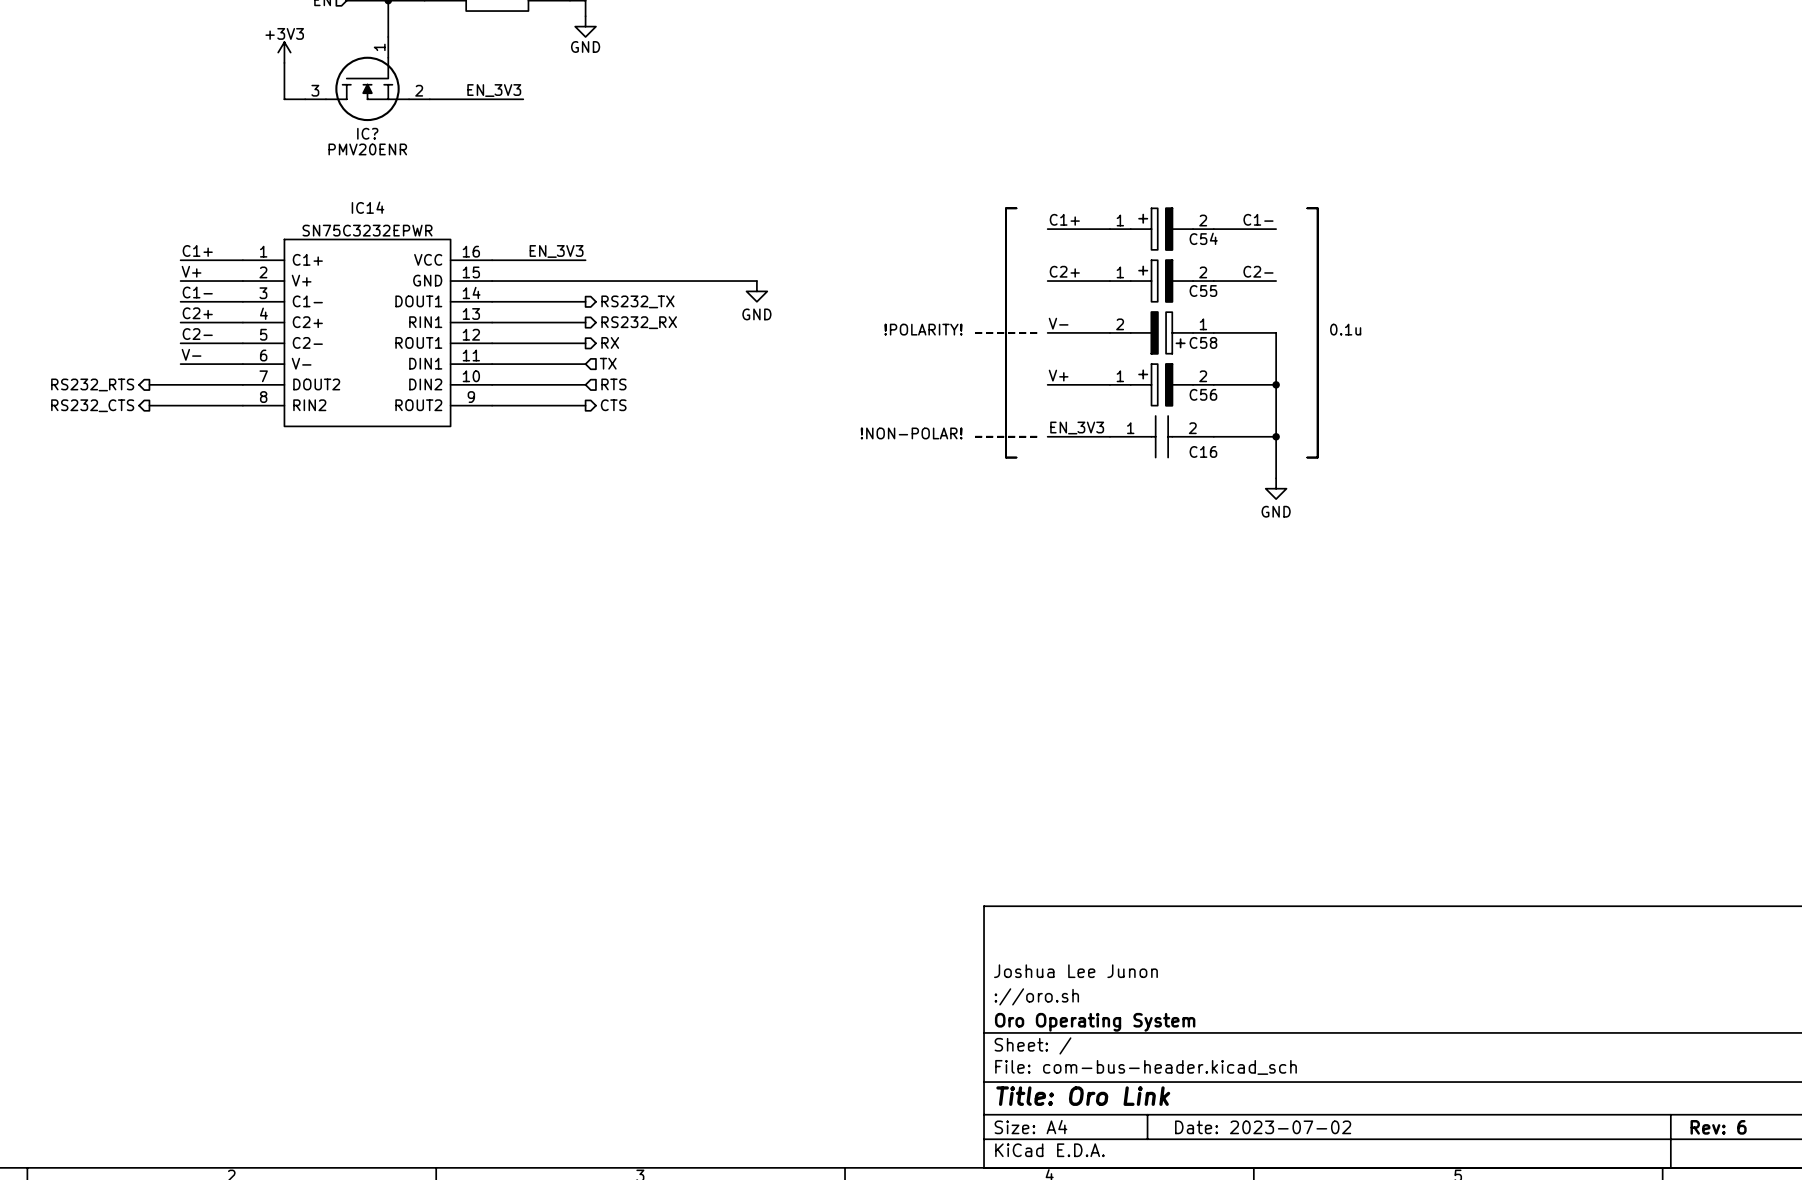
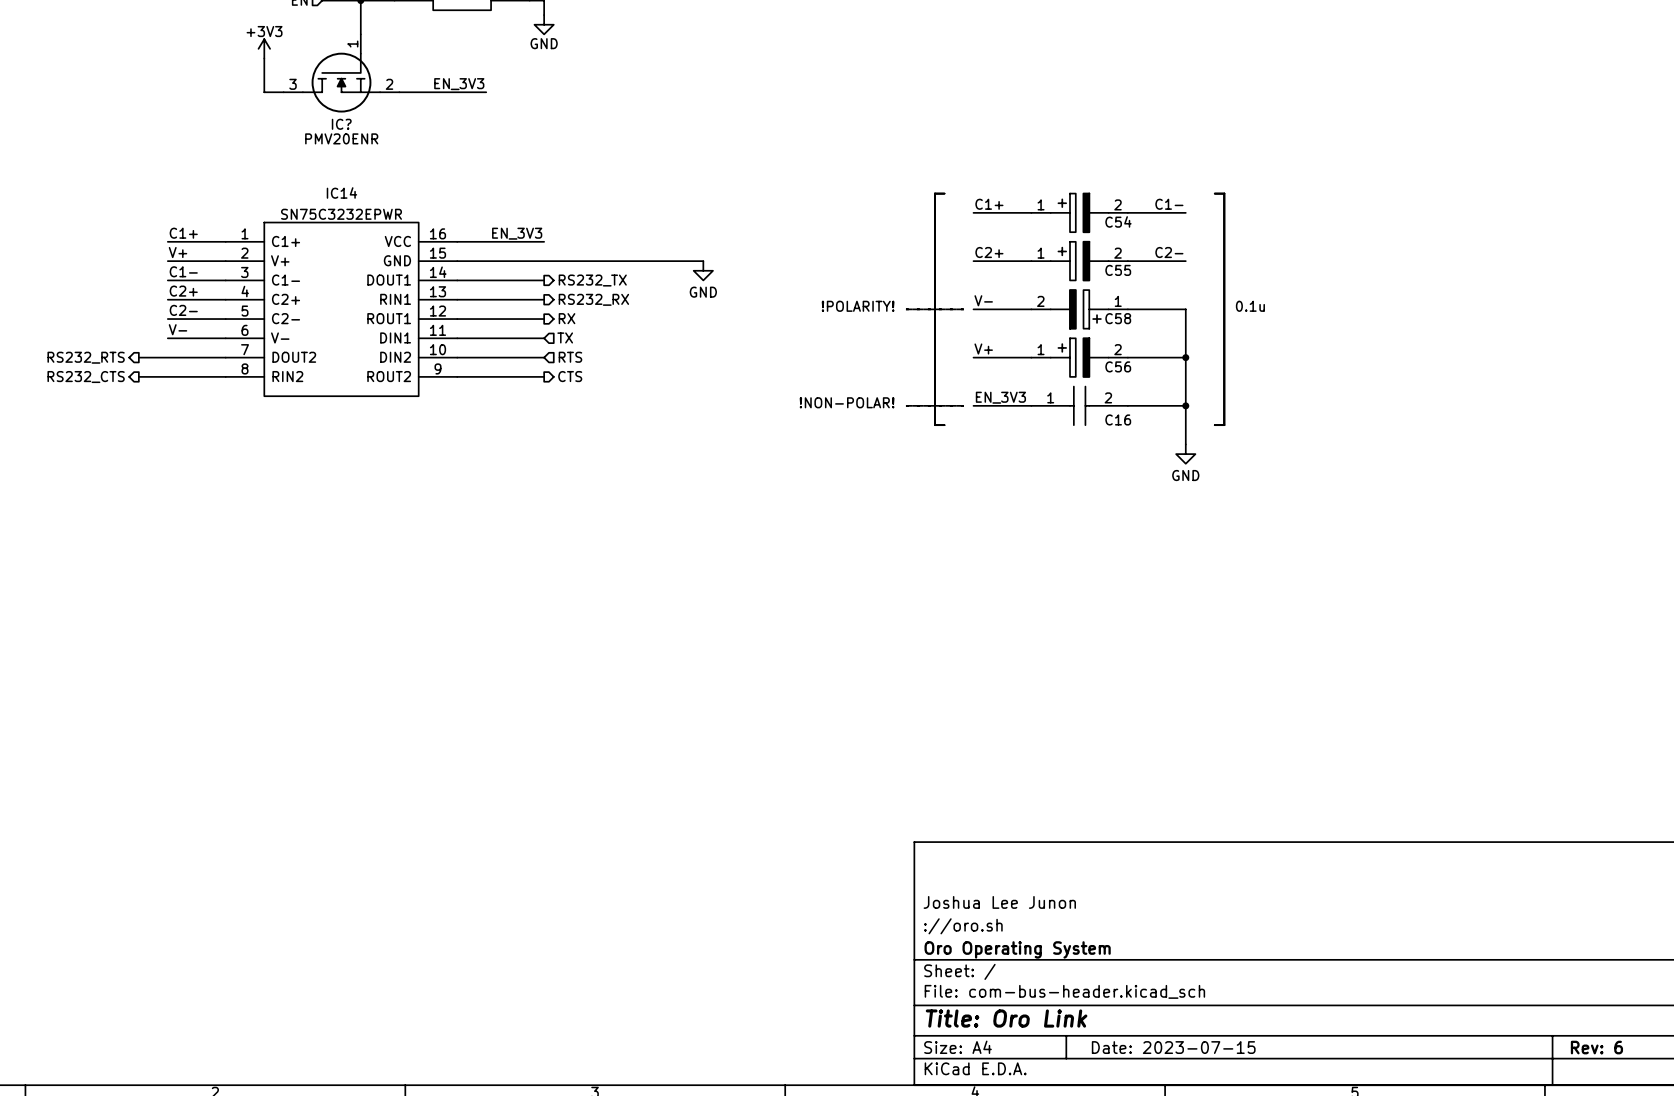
title block: Date: 2023-07-02 (1263, 1127) -> Date: 2023-07-15 (1173, 1047)

